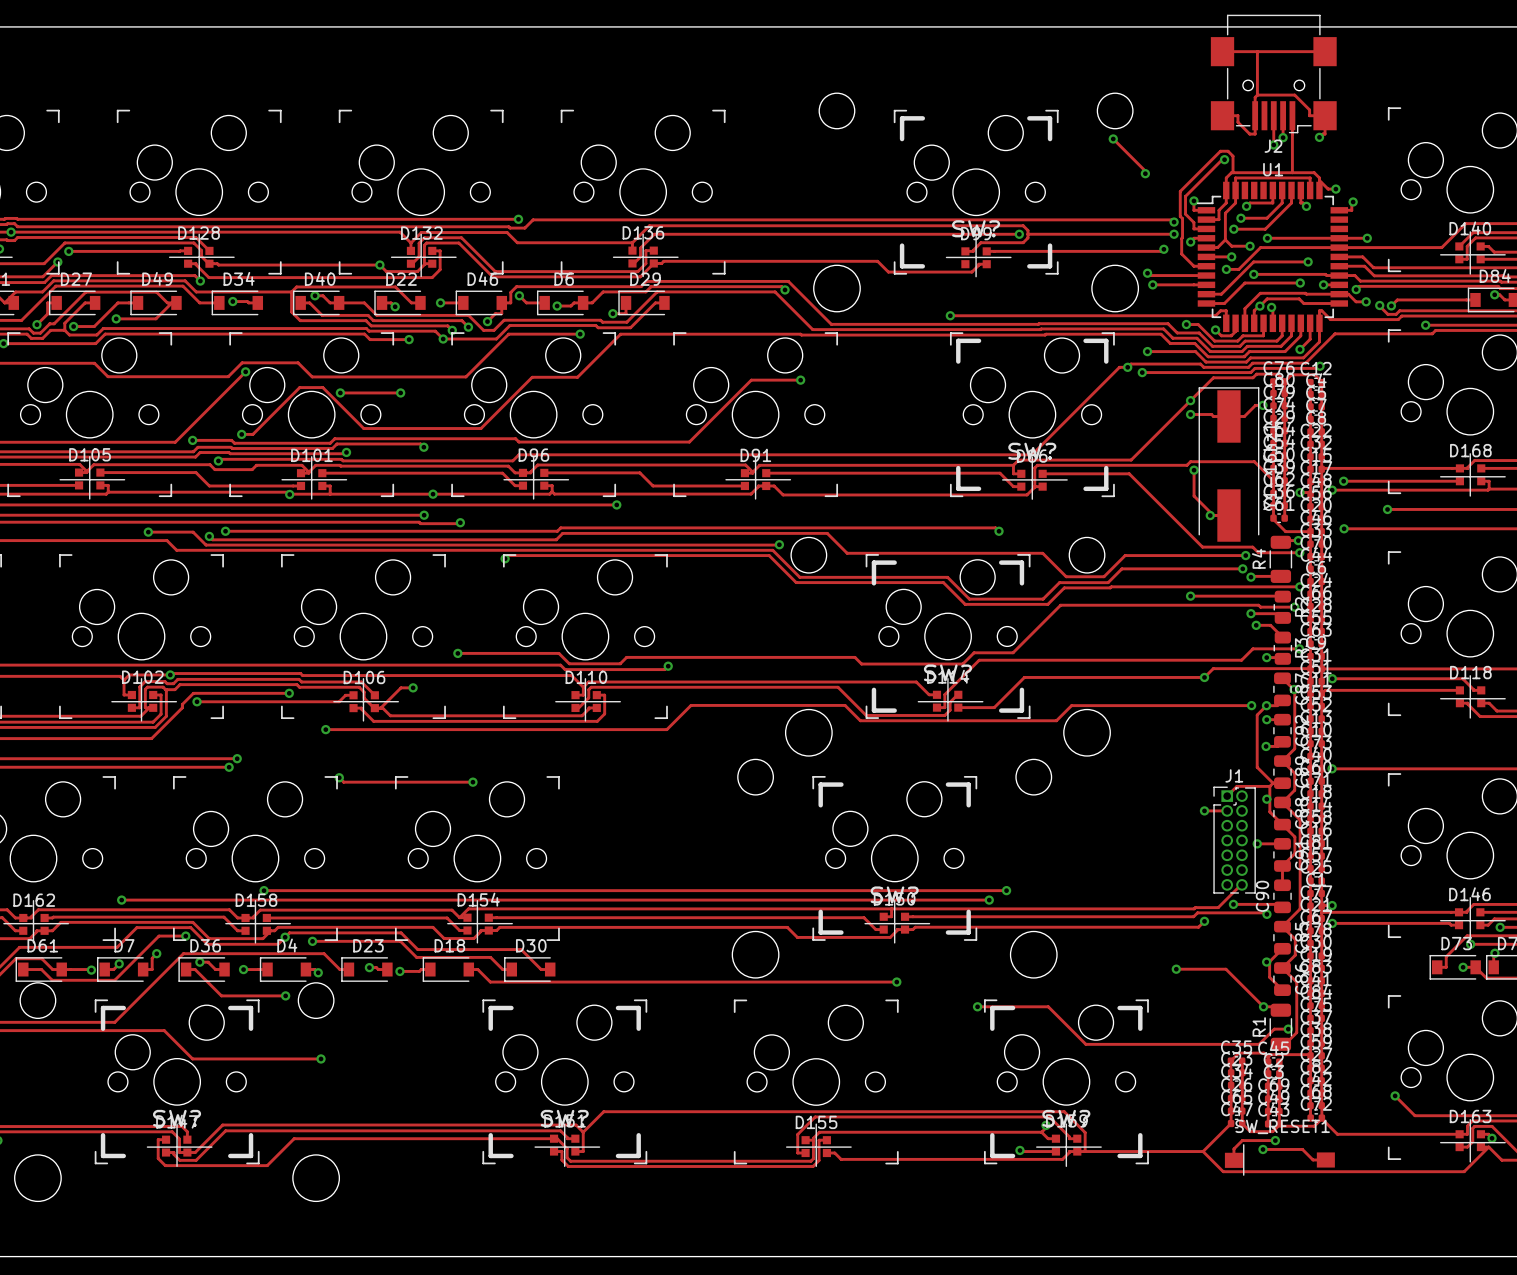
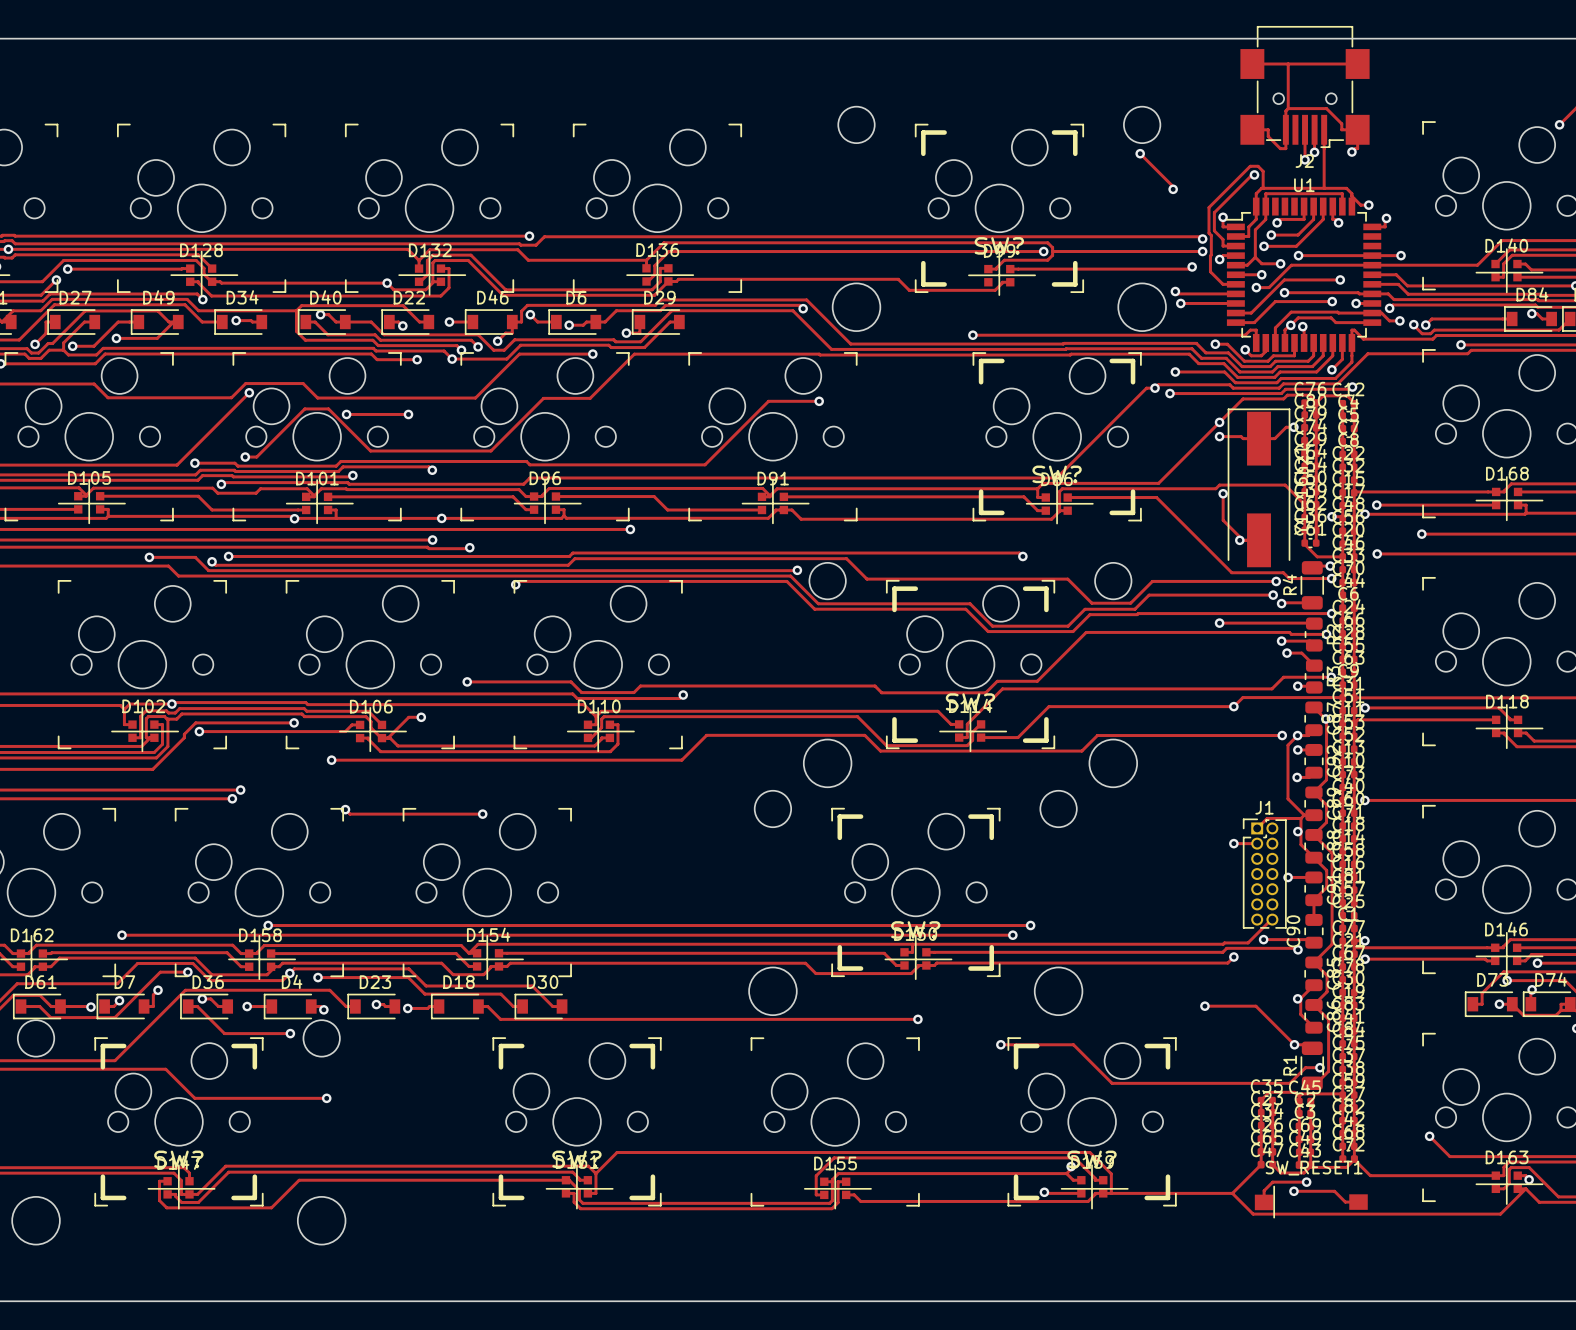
C12 footprint: [1307, 377, 1325, 388] -> [1339, 399, 1358, 408]
C79 footprint: [1270, 401, 1288, 411] -> [1301, 423, 1320, 432]
C5 footprint: [1307, 401, 1325, 412] -> [1339, 424, 1358, 433]
C74 footprint: [1270, 413, 1288, 424] -> [1301, 436, 1320, 445]
C29 footprint: [1270, 425, 1288, 436] -> [1301, 449, 1320, 458]
C56 footprint: [1307, 501, 1325, 512] -> [1339, 527, 1358, 536]
C44 footprint: [1307, 564, 1325, 574] -> [1339, 591, 1358, 600]
C6 footprint: [1307, 576, 1325, 587] -> [1339, 604, 1358, 612]
C1 footprint: [1307, 888, 1325, 899] -> [1339, 924, 1358, 933]
C21 footprint: [1307, 913, 1325, 924] -> [1339, 950, 1358, 958]
C45 footprint: [1264, 1057, 1283, 1067] -> [1295, 1097, 1315, 1106]
C27 footprint: [1307, 1063, 1325, 1074] -> [1339, 1104, 1358, 1112]
C2 footprint: [1264, 1068, 1283, 1079] -> [1295, 1109, 1315, 1118]
C82 footprint: [1307, 1075, 1325, 1086] -> [1339, 1116, 1358, 1125]
C3 footprint: [1264, 1081, 1283, 1092] -> [1295, 1122, 1315, 1131]
C26 footprint: [1227, 1093, 1246, 1104] -> [1257, 1135, 1277, 1143]
C69 footprint: [1264, 1094, 1283, 1104] -> [1295, 1135, 1315, 1144]
C65 footprint: [1227, 1106, 1246, 1116] -> [1257, 1148, 1277, 1156]
C72 footprint: [1307, 1113, 1326, 1123] -> [1339, 1155, 1358, 1163]
C47 footprint: [1227, 1118, 1246, 1129] -> [1257, 1160, 1277, 1169]
C43 footprint: [1264, 1119, 1283, 1129] -> [1295, 1161, 1315, 1169]

